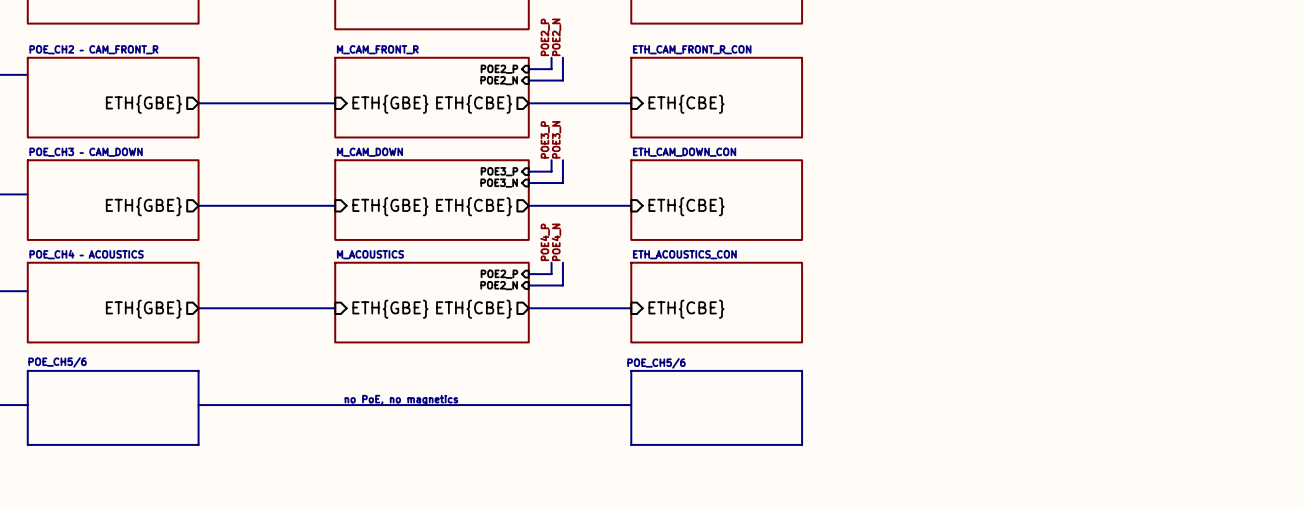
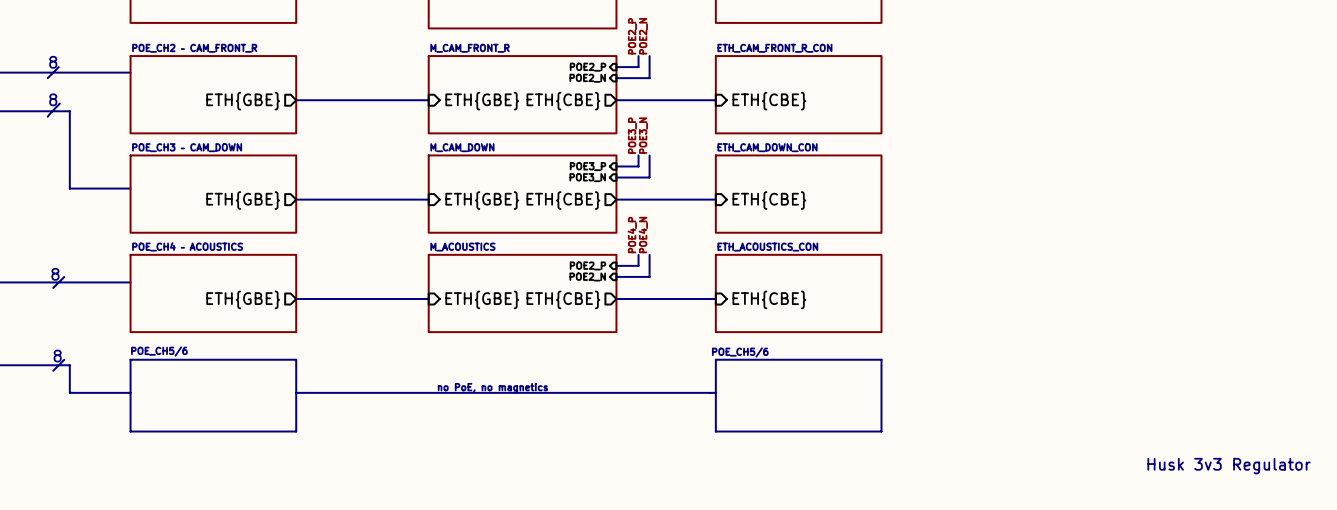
text: none -> Husk 3v3 Regulator (1229, 466)

